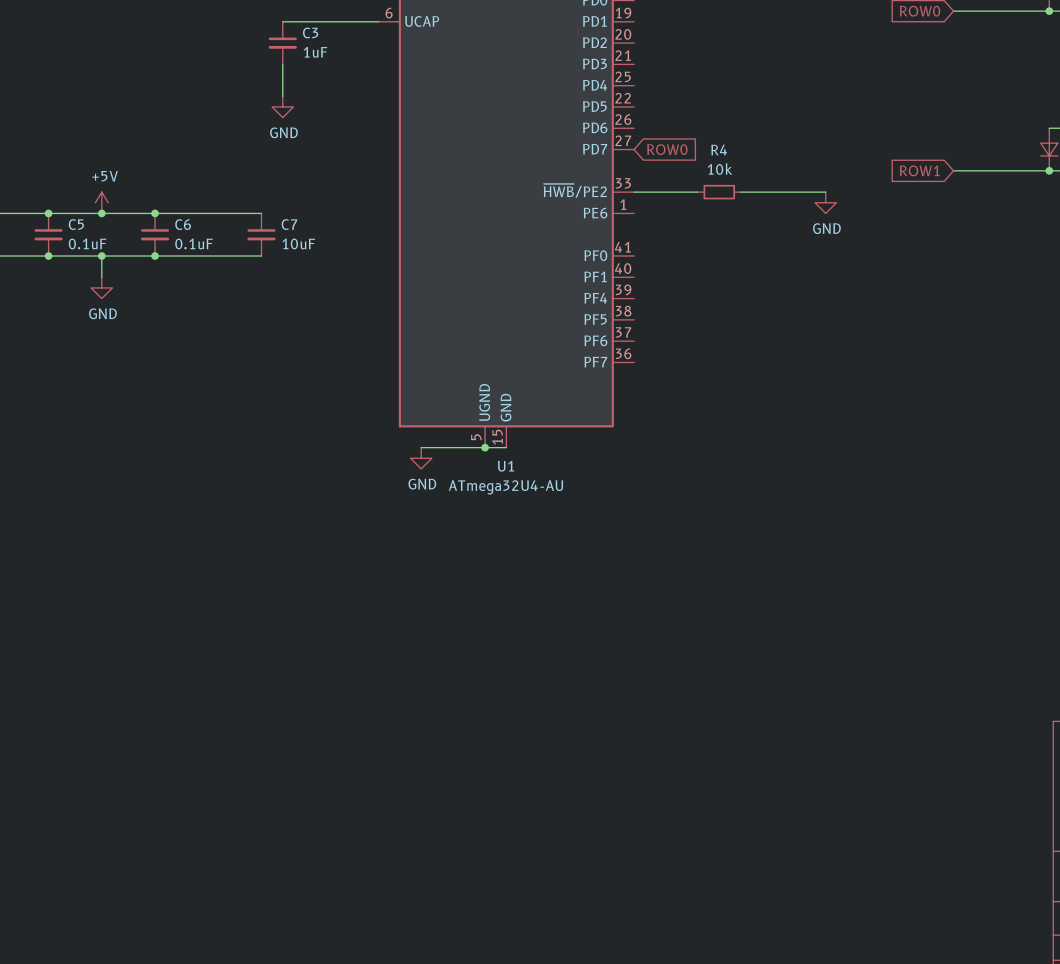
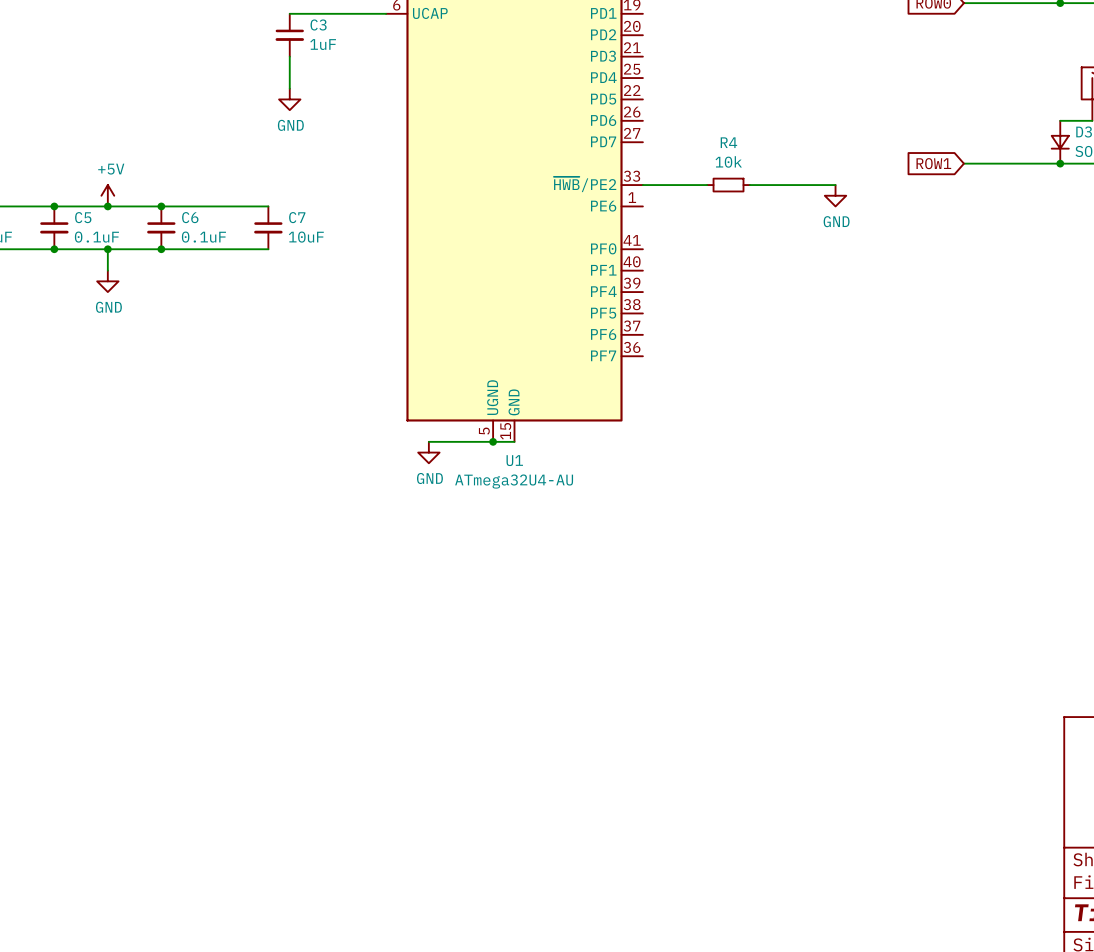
global label: ROW0 (667, 149) -> none

